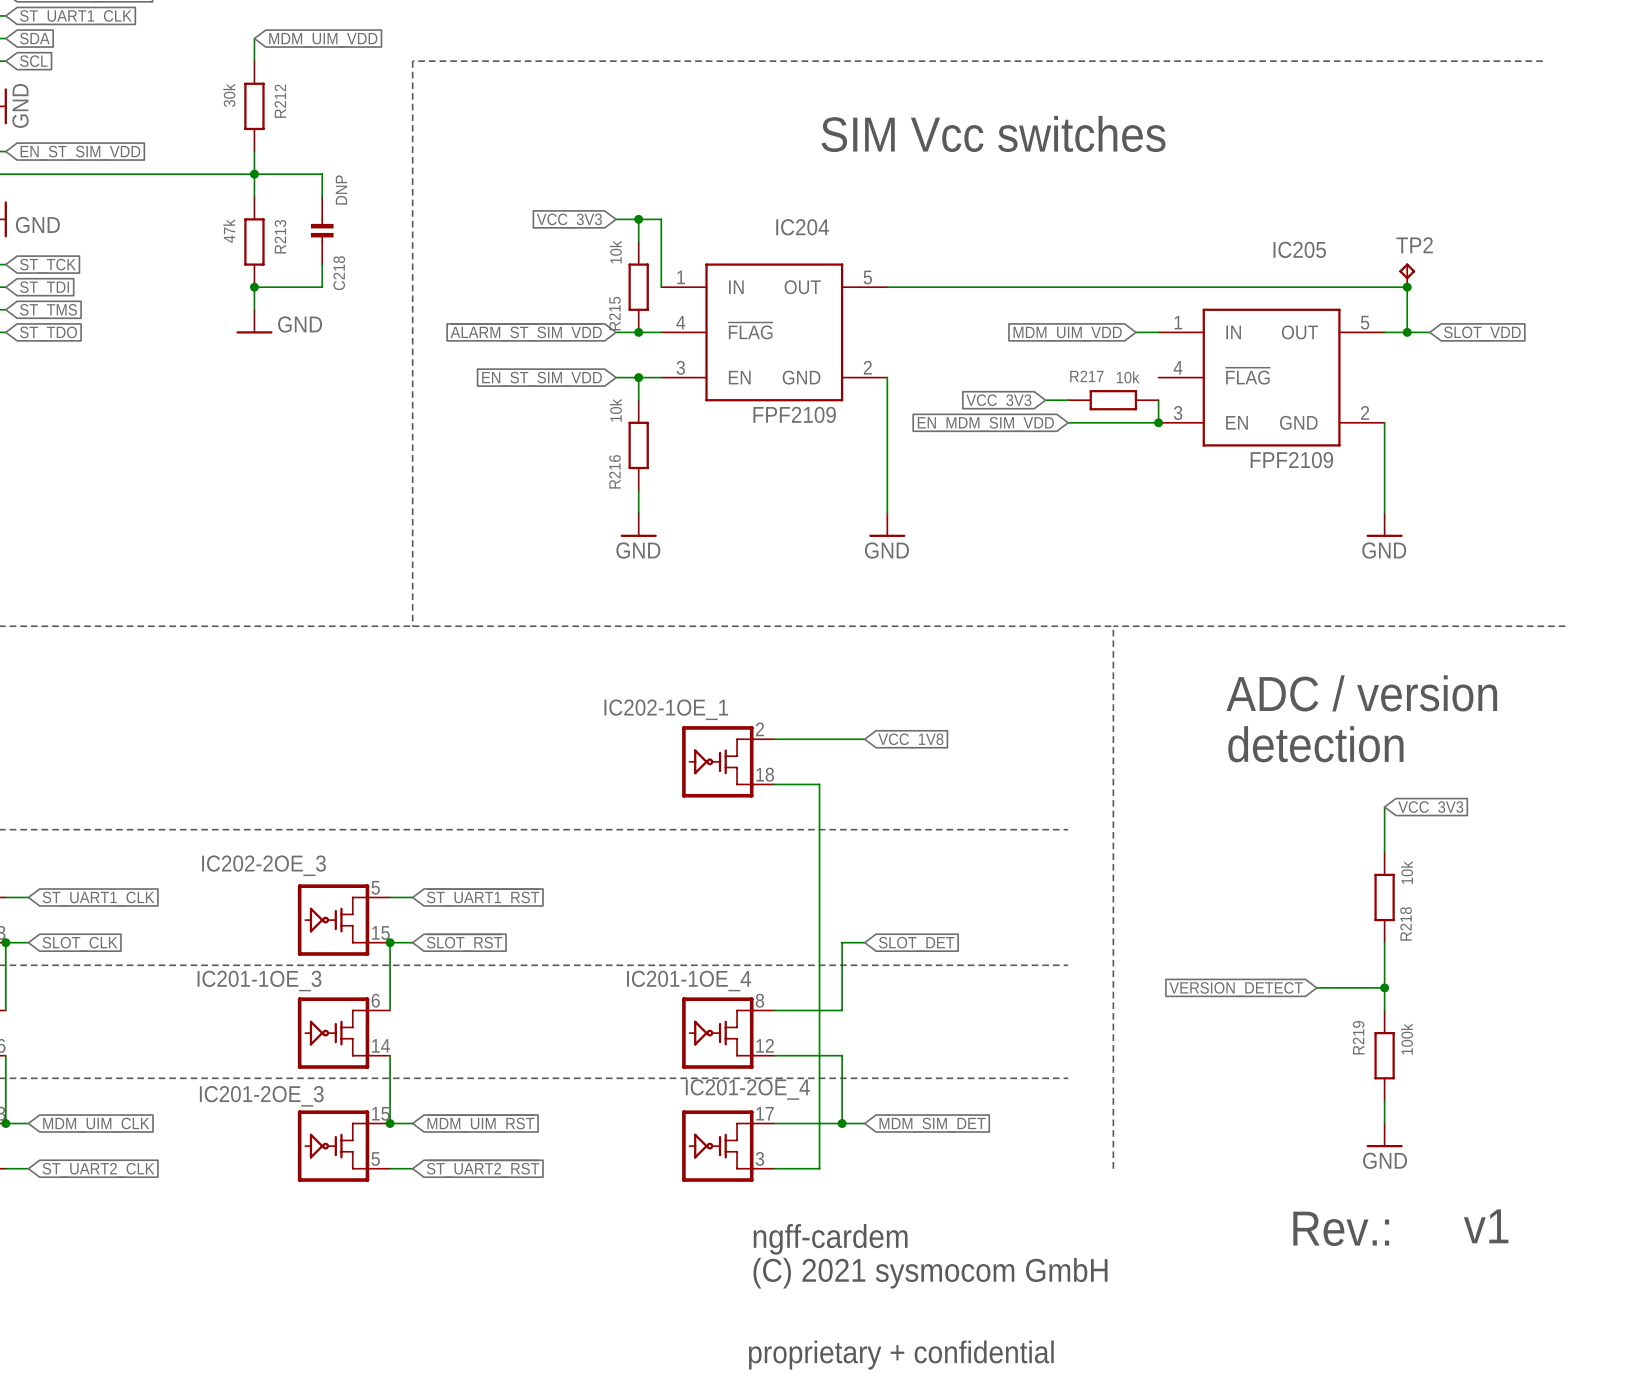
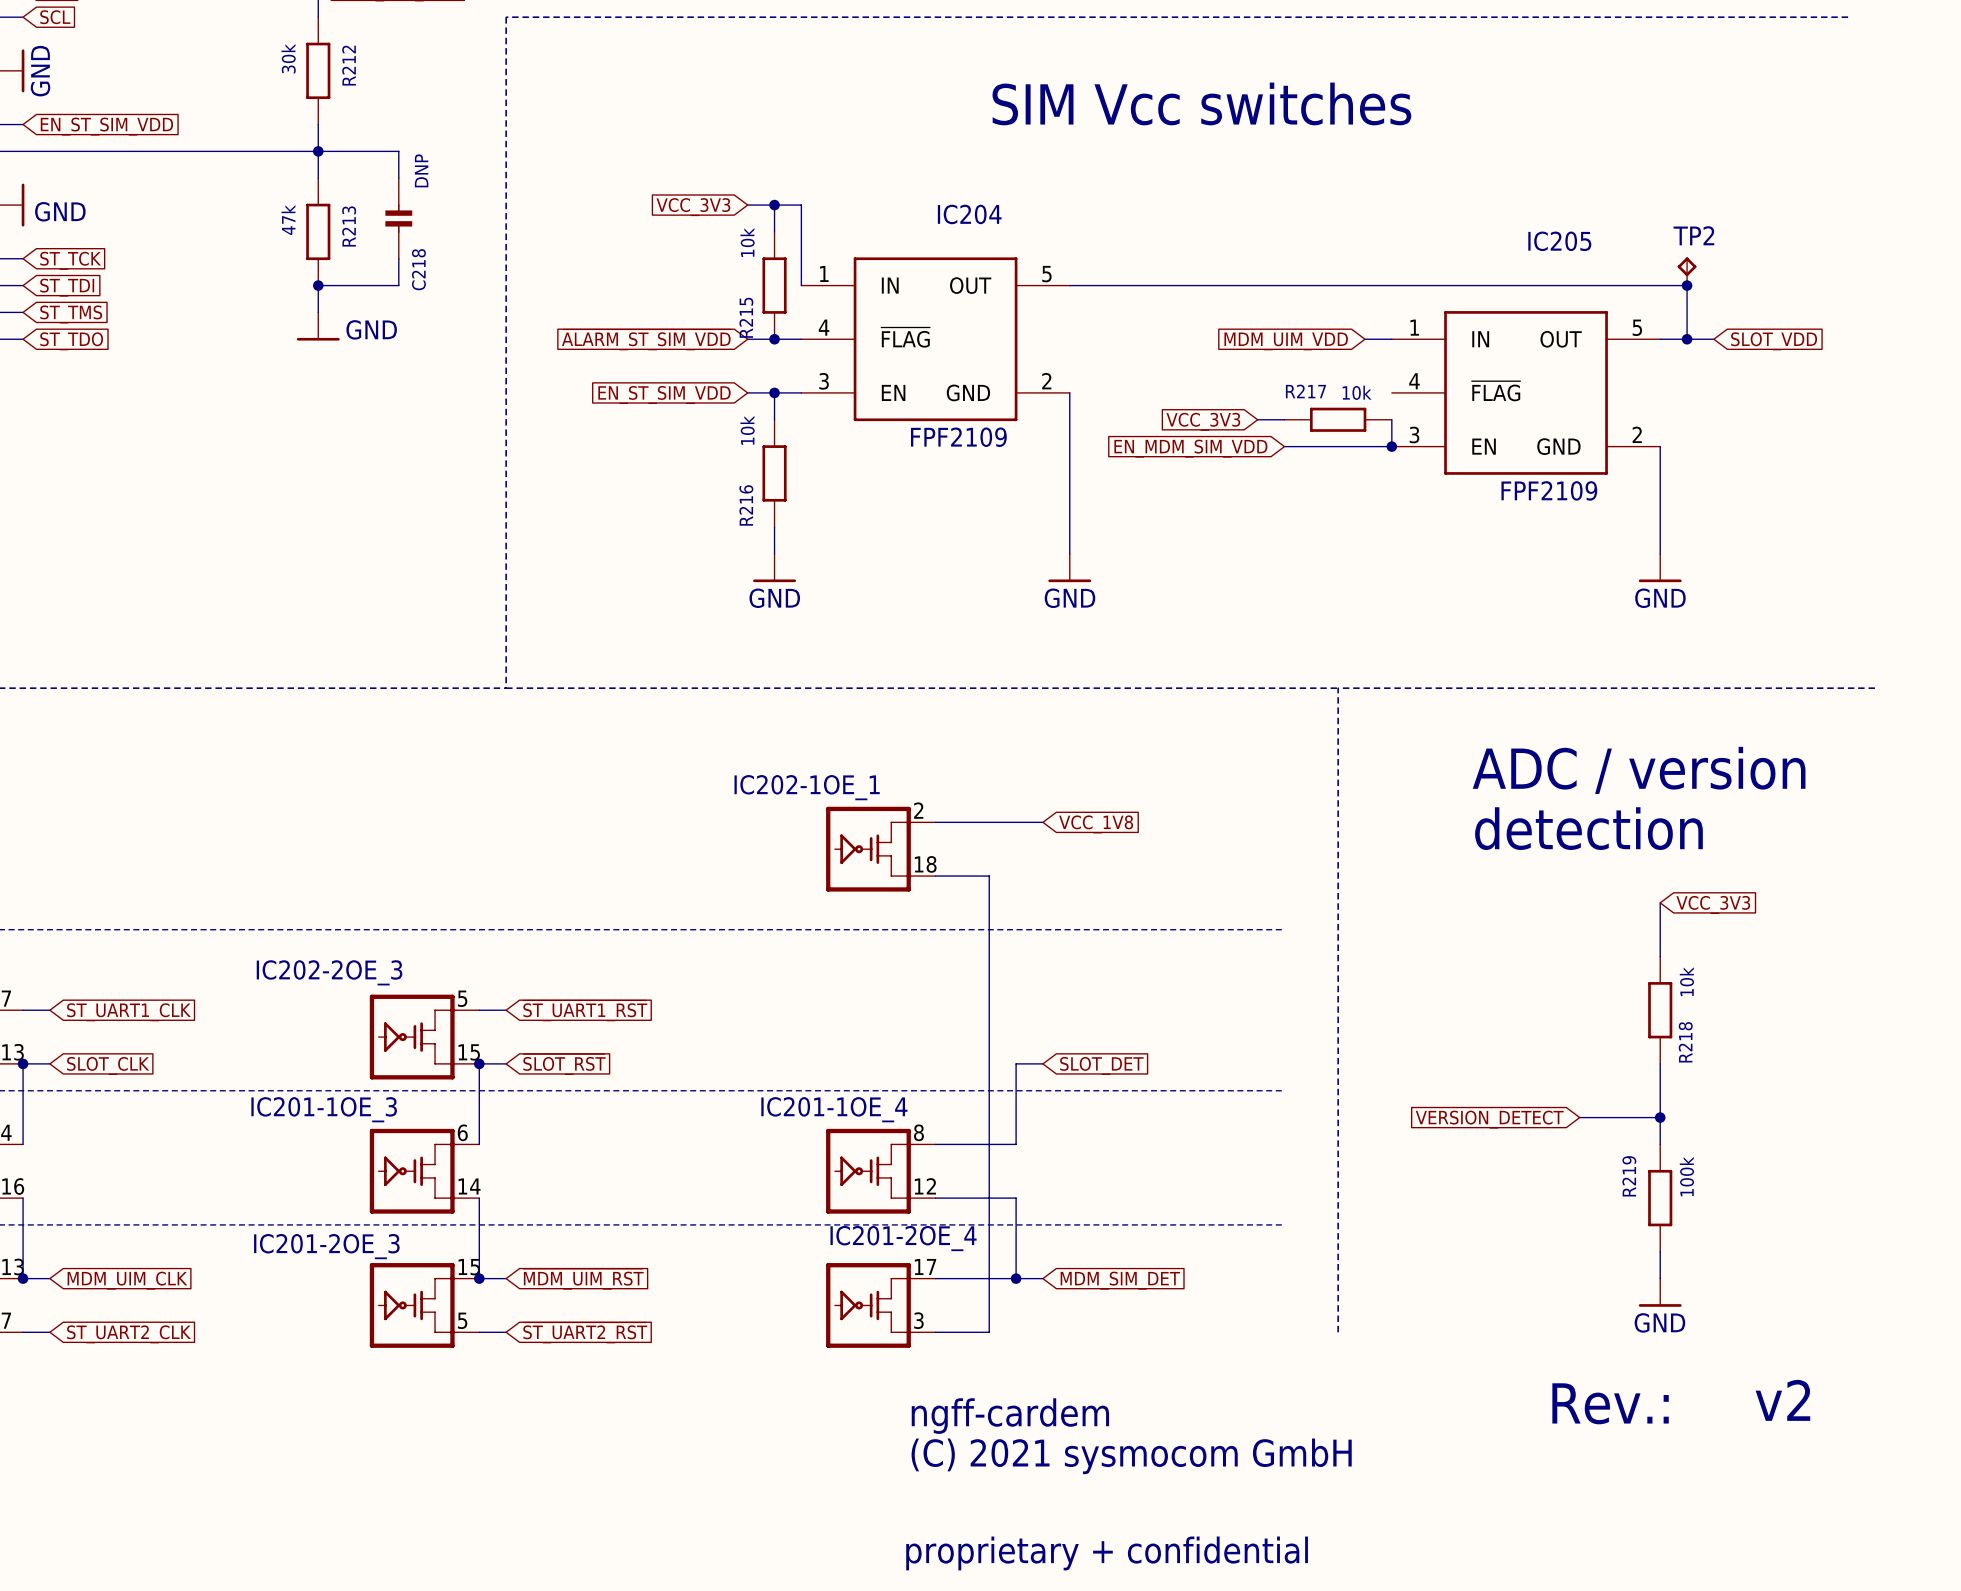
text: v1 (1486, 1226) -> v2 (1782, 1400)

